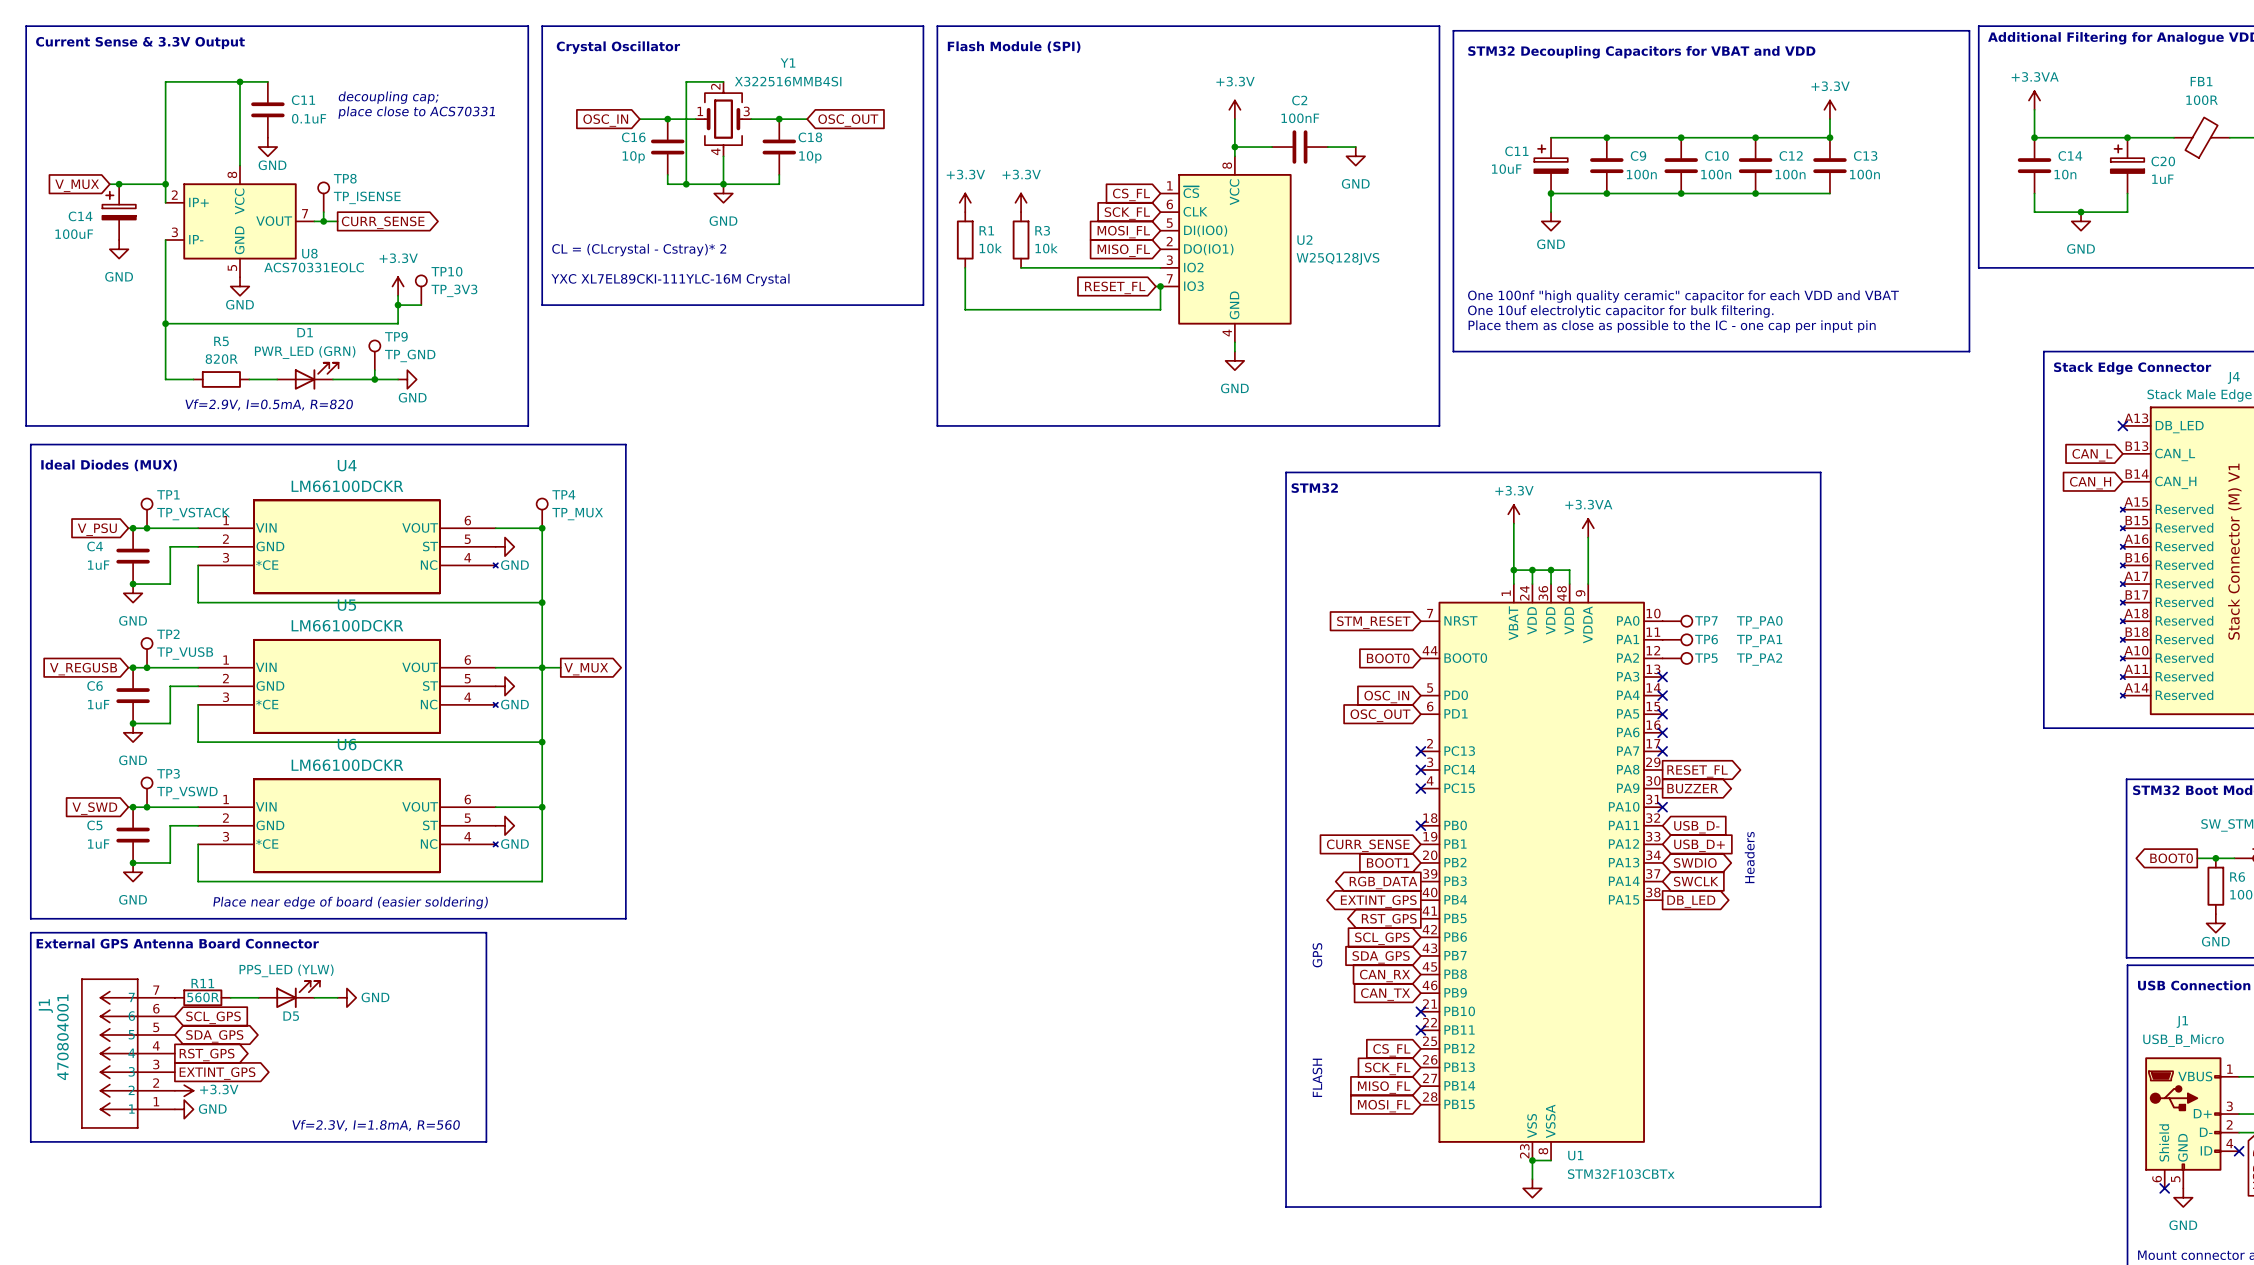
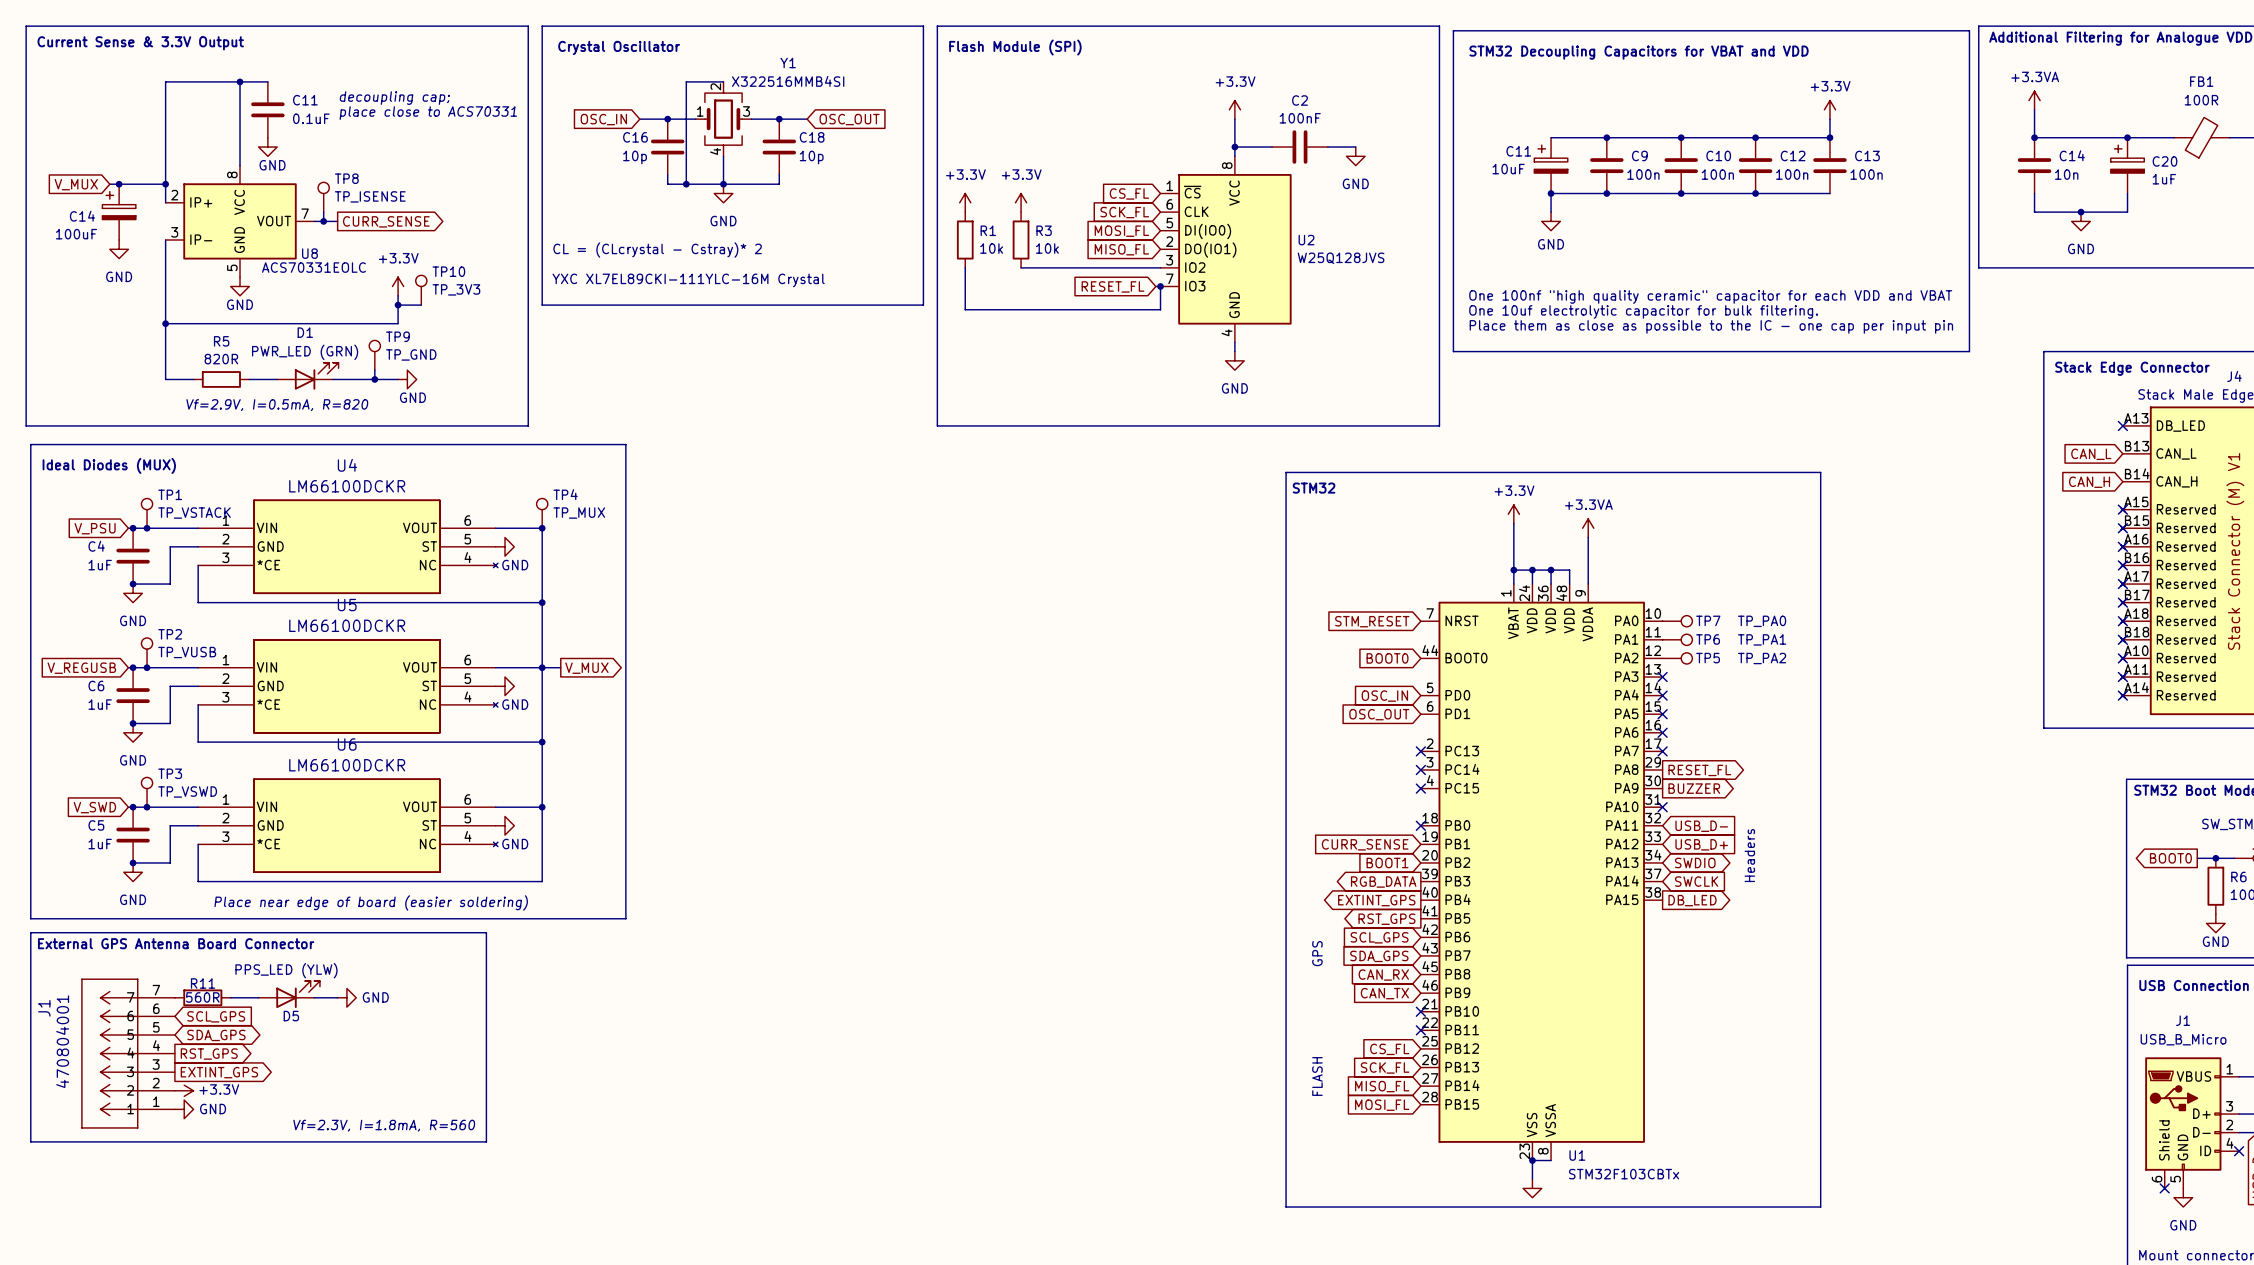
no-connect mark: none -> (2122, 509)
no-connect mark: none -> (2122, 528)
no-connect mark: none -> (2122, 546)
no-connect mark: none -> (2122, 565)
no-connect mark: none -> (2122, 584)
no-connect mark: none -> (2122, 602)
no-connect mark: none -> (2122, 621)
no-connect mark: none -> (2122, 639)
no-connect mark: none -> (2122, 658)
no-connect mark: none -> (2122, 677)
no-connect mark: none -> (2122, 695)

